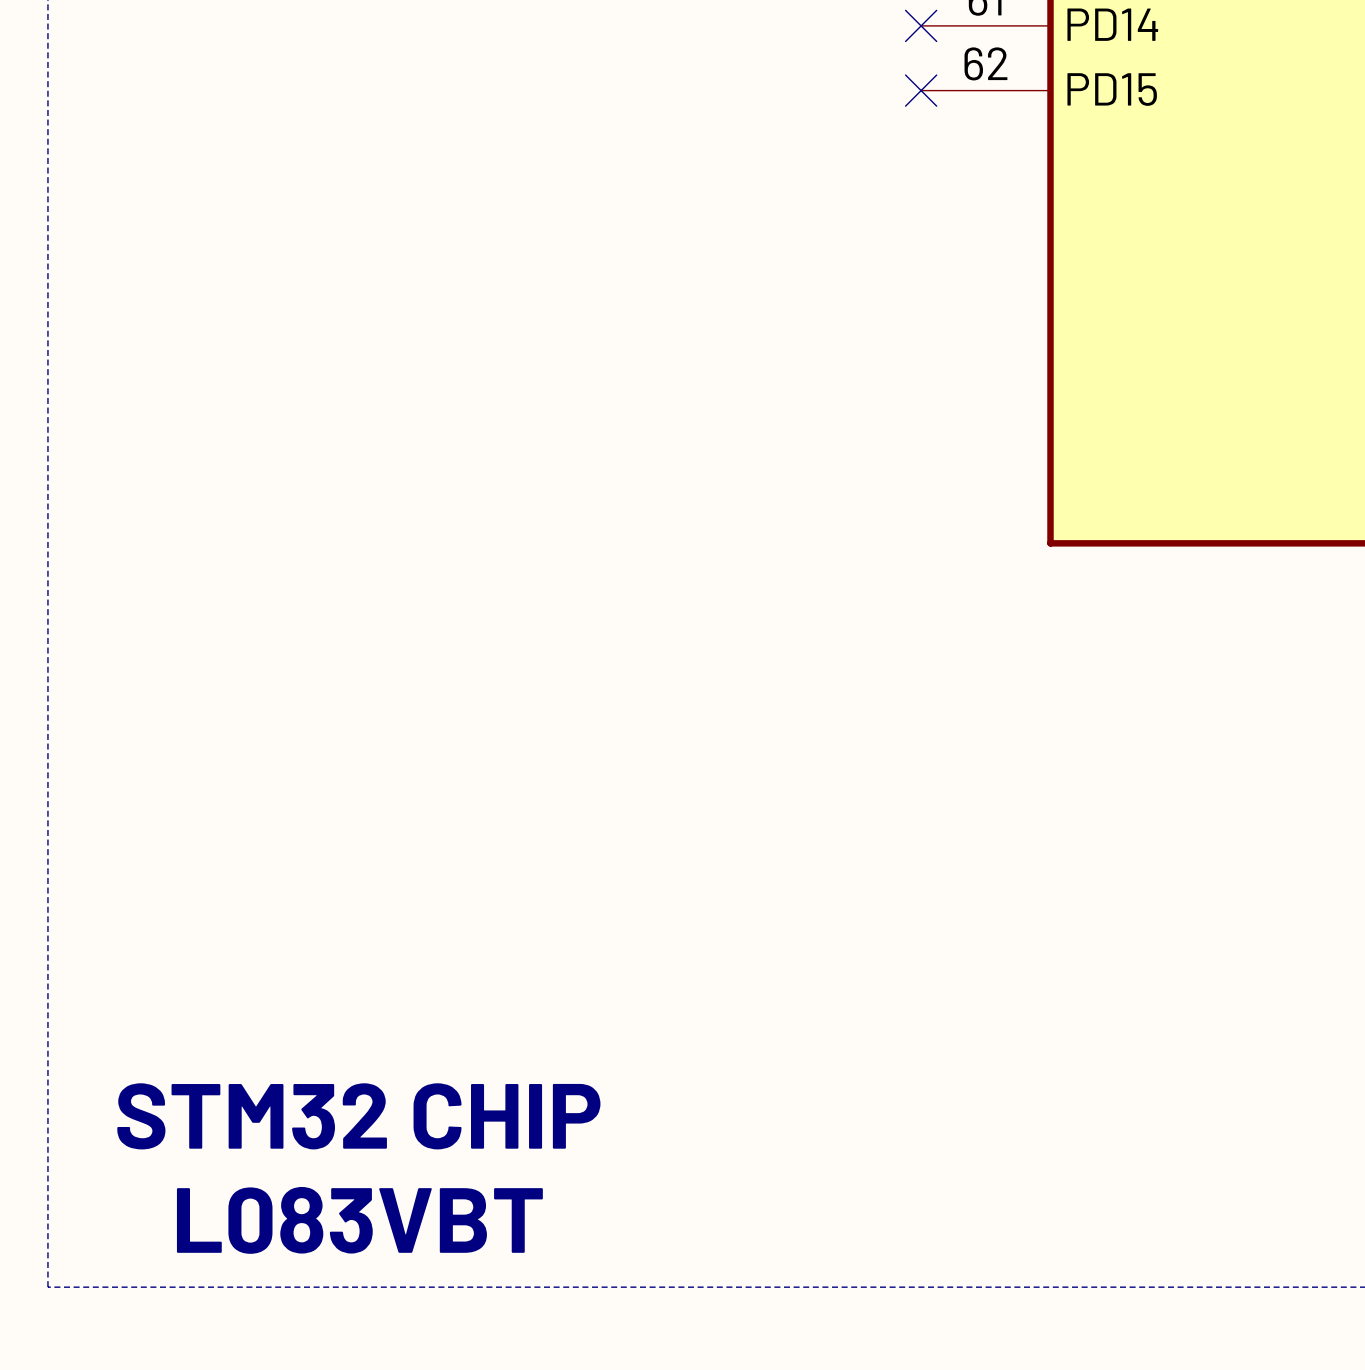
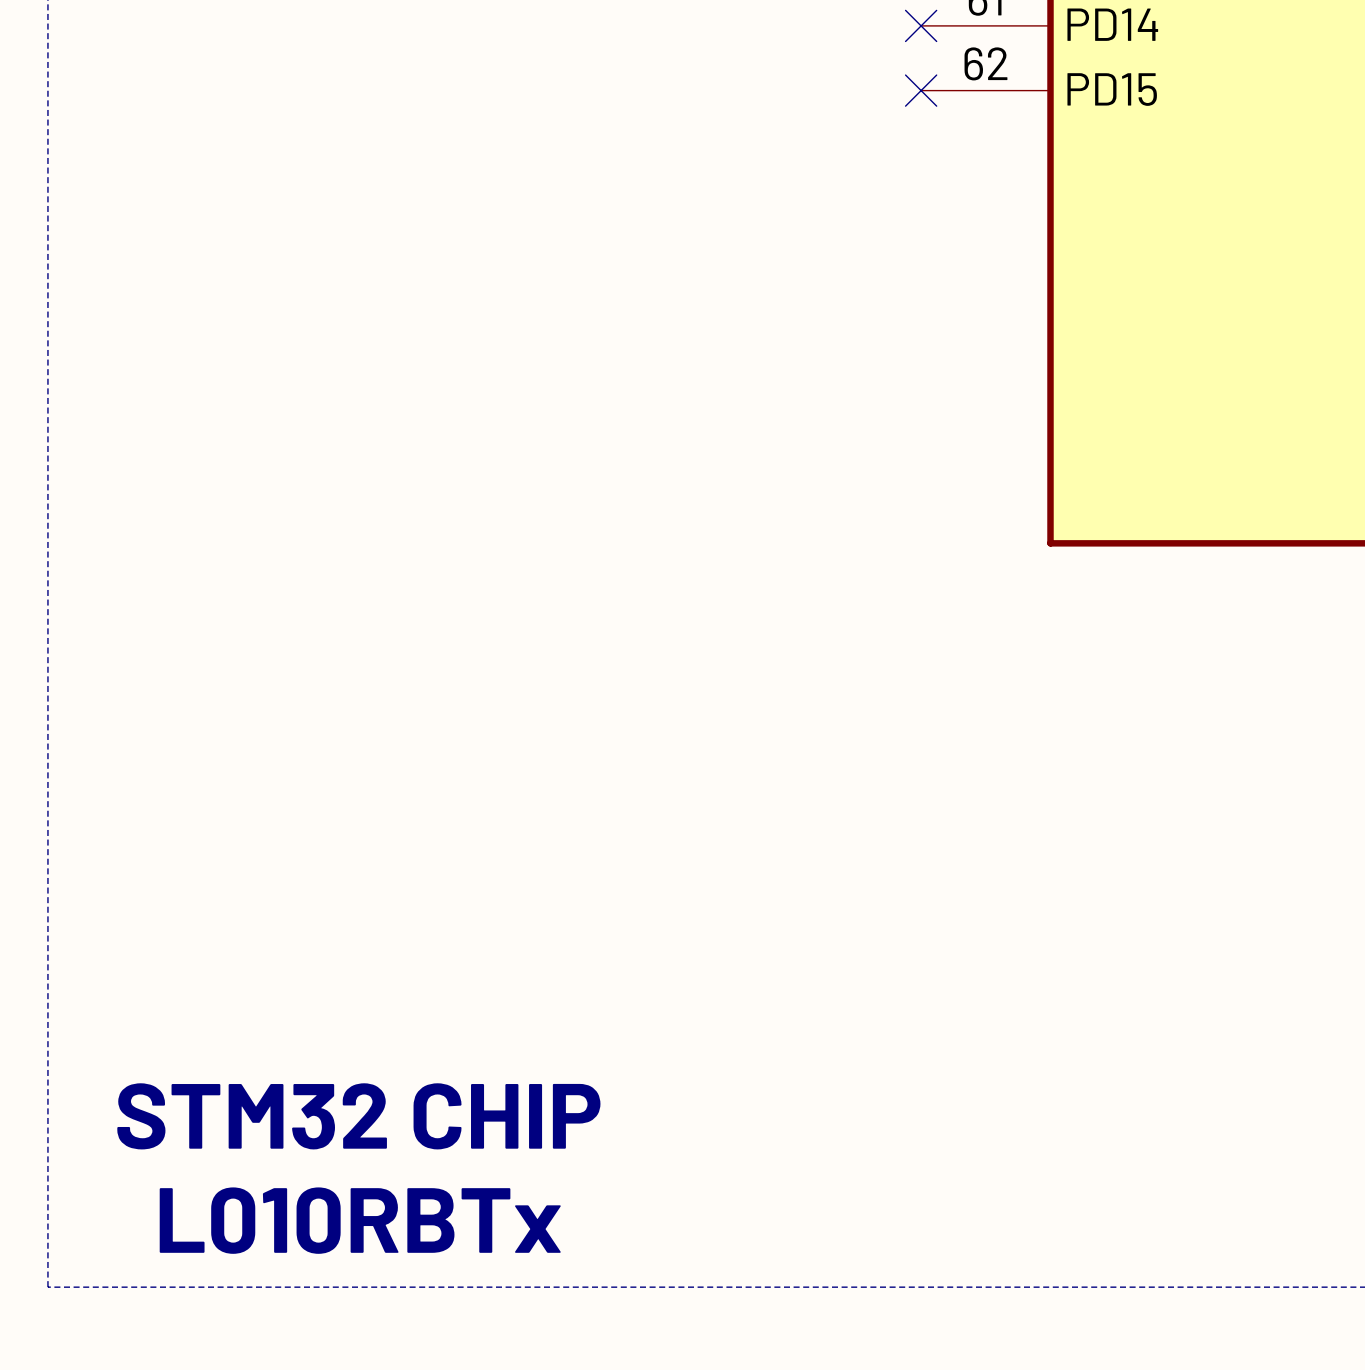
text: L083VBT (359, 1220) -> L010RBTx (360, 1220)

